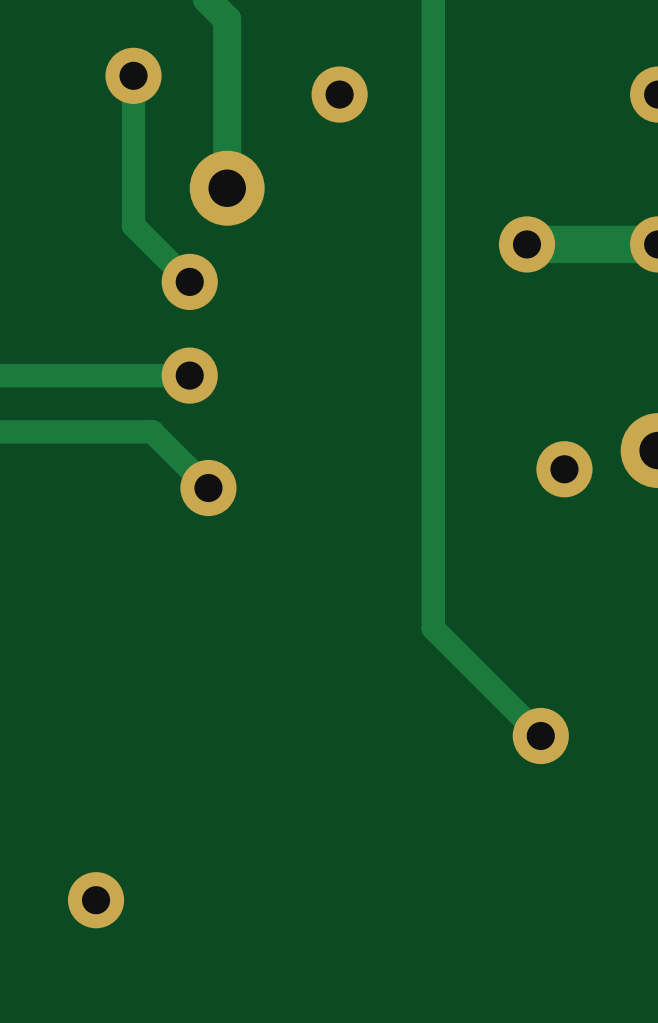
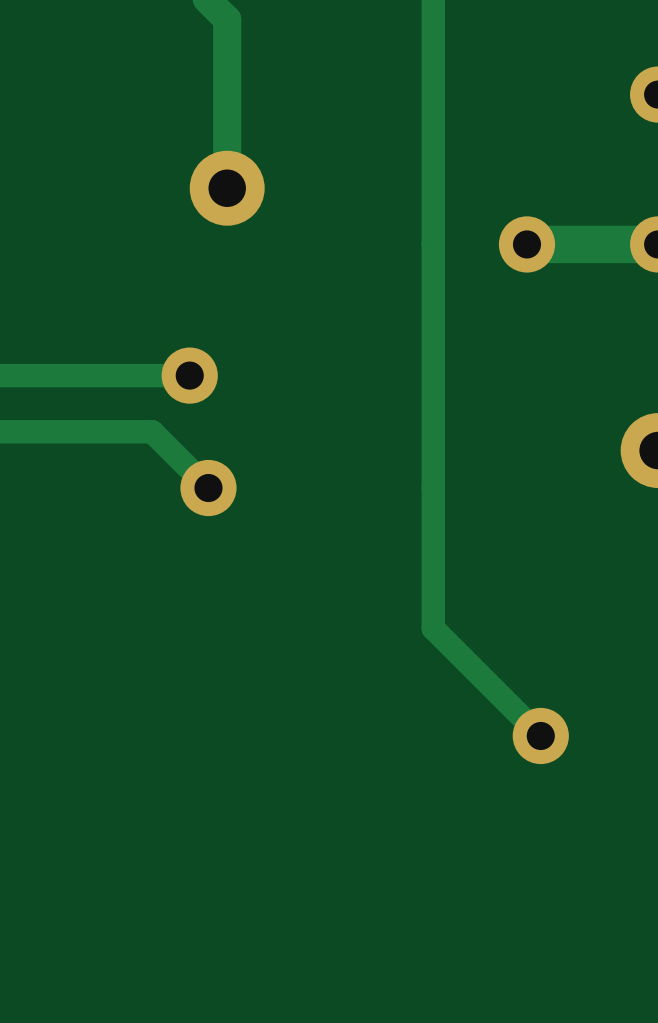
track: (133, 75) (133, 225) (189, 281) -> none
via: (133, 75) -> none
via: (339, 94) -> none
via: (189, 281) -> none
via: (564, 469) -> none
via: (96, 900) -> none

